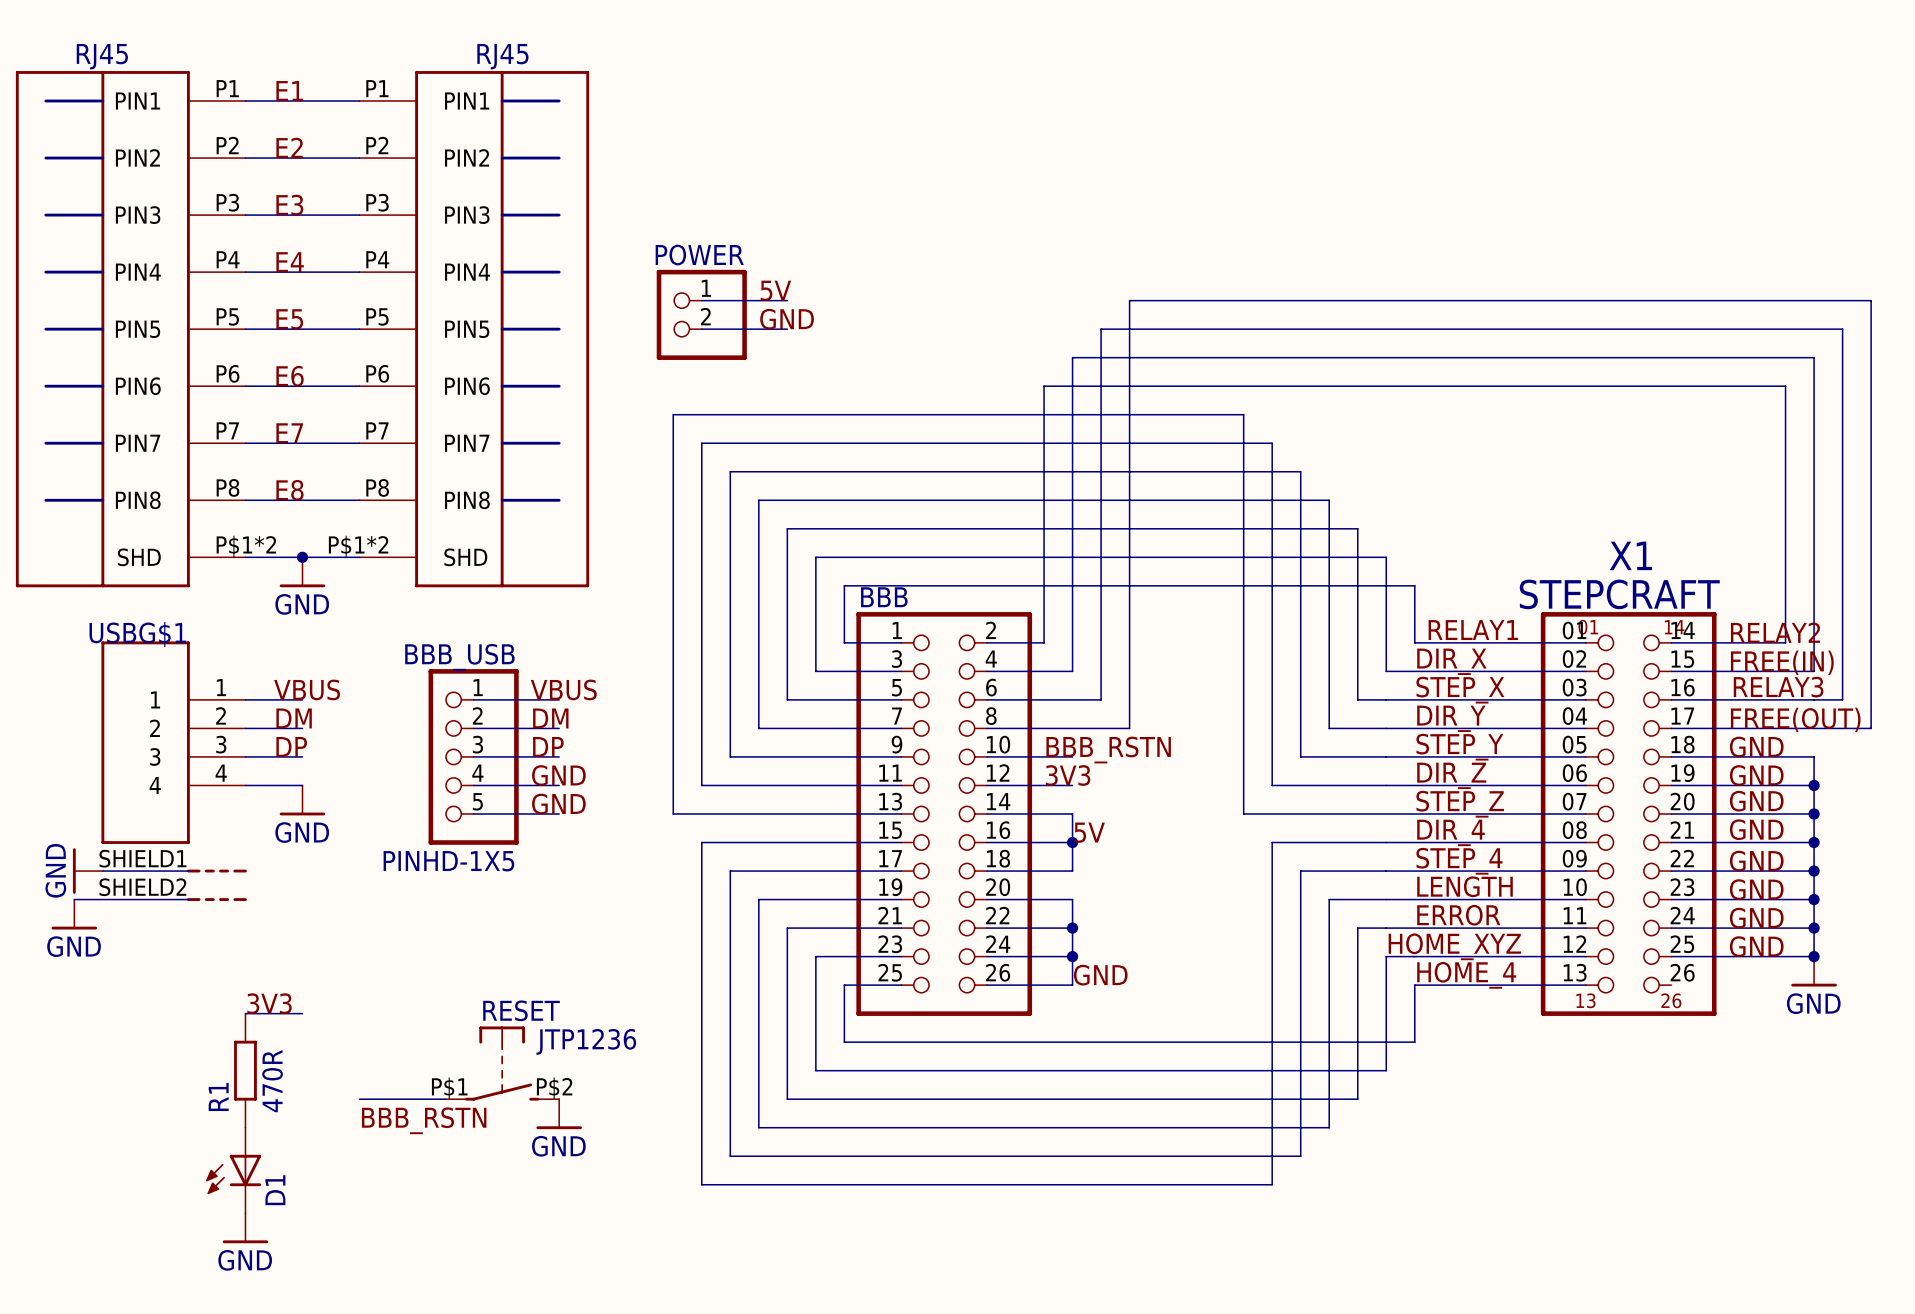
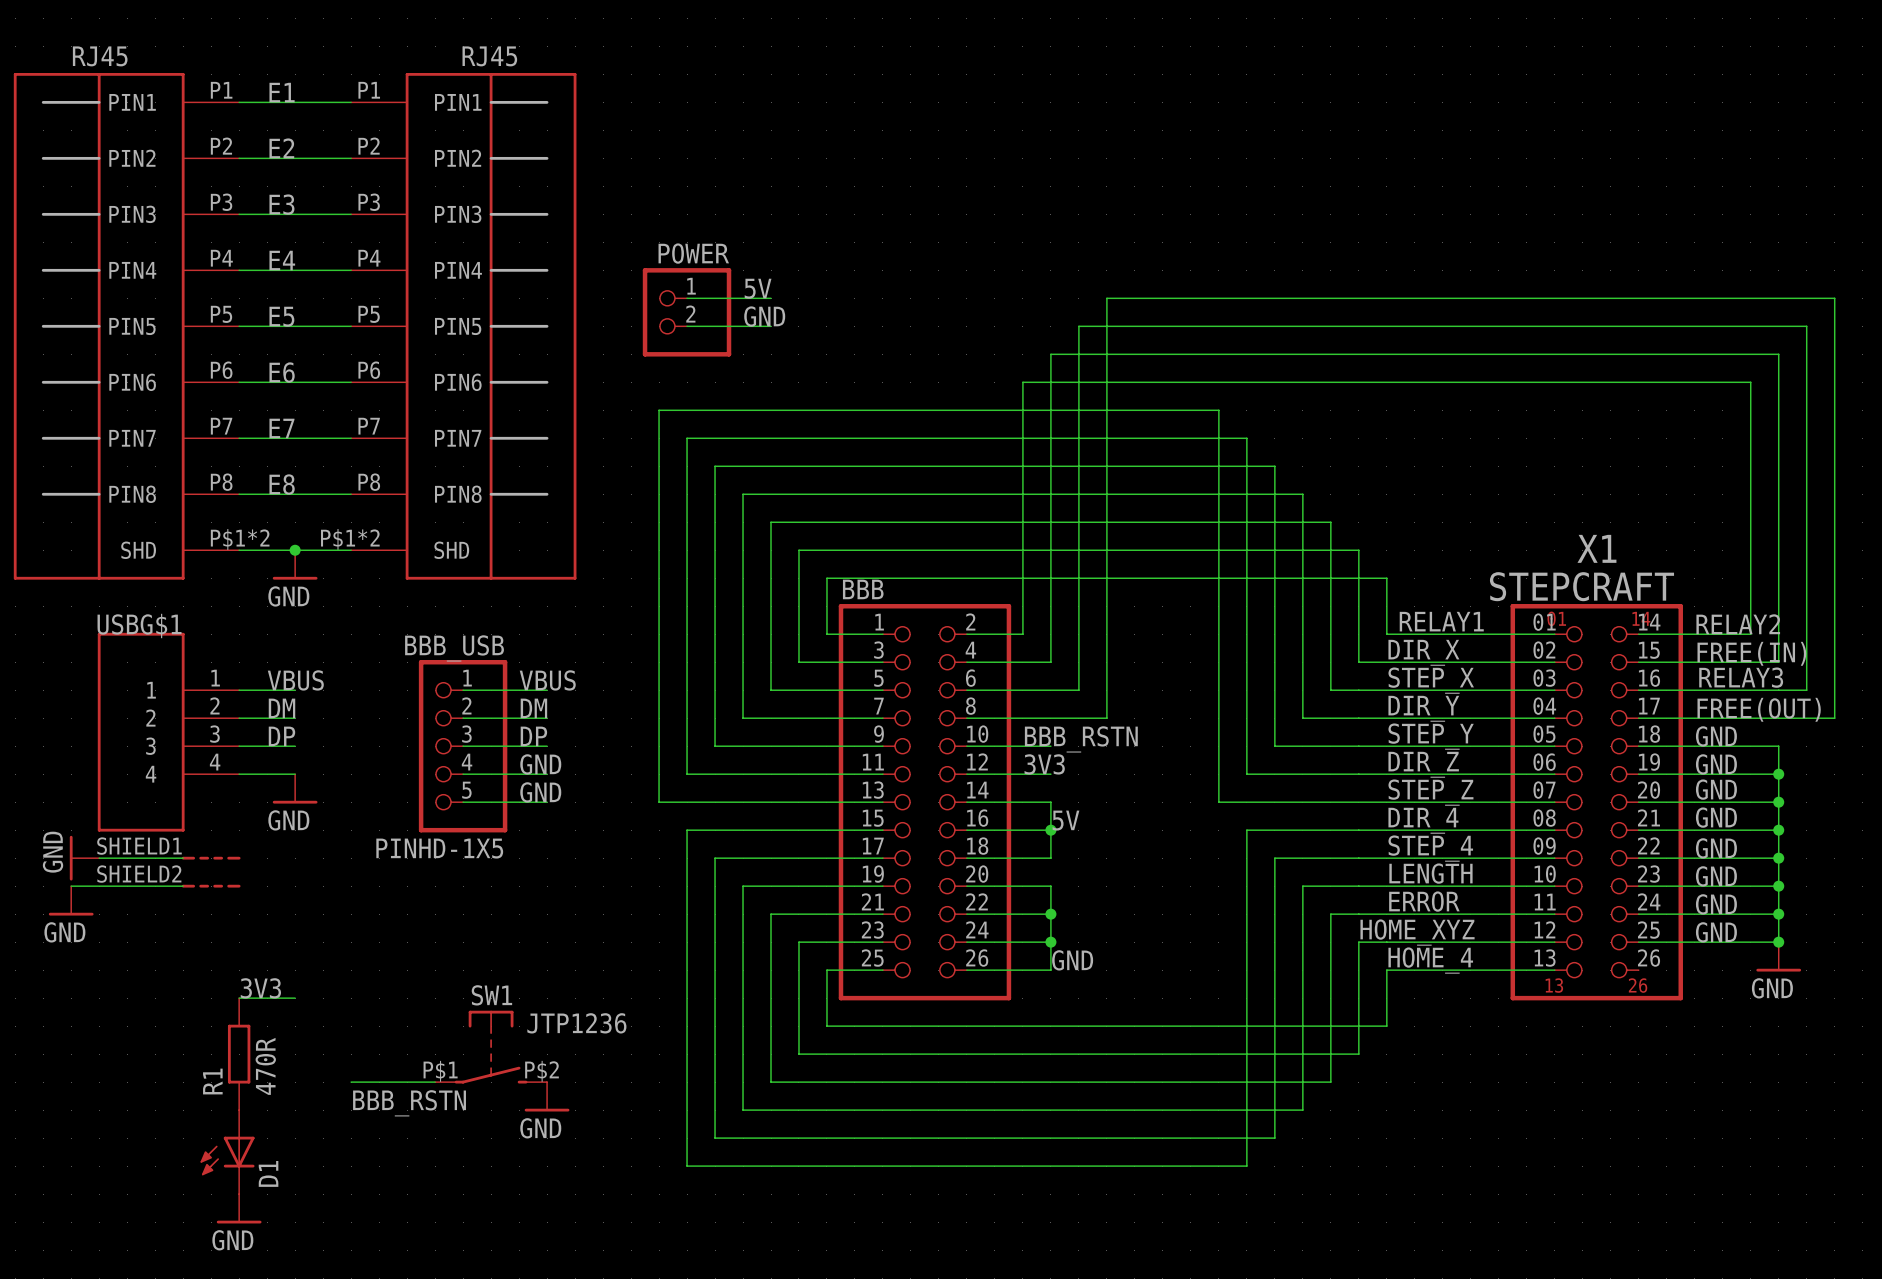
RESET name: RESET (521, 1010) -> SW1 (491, 995)

